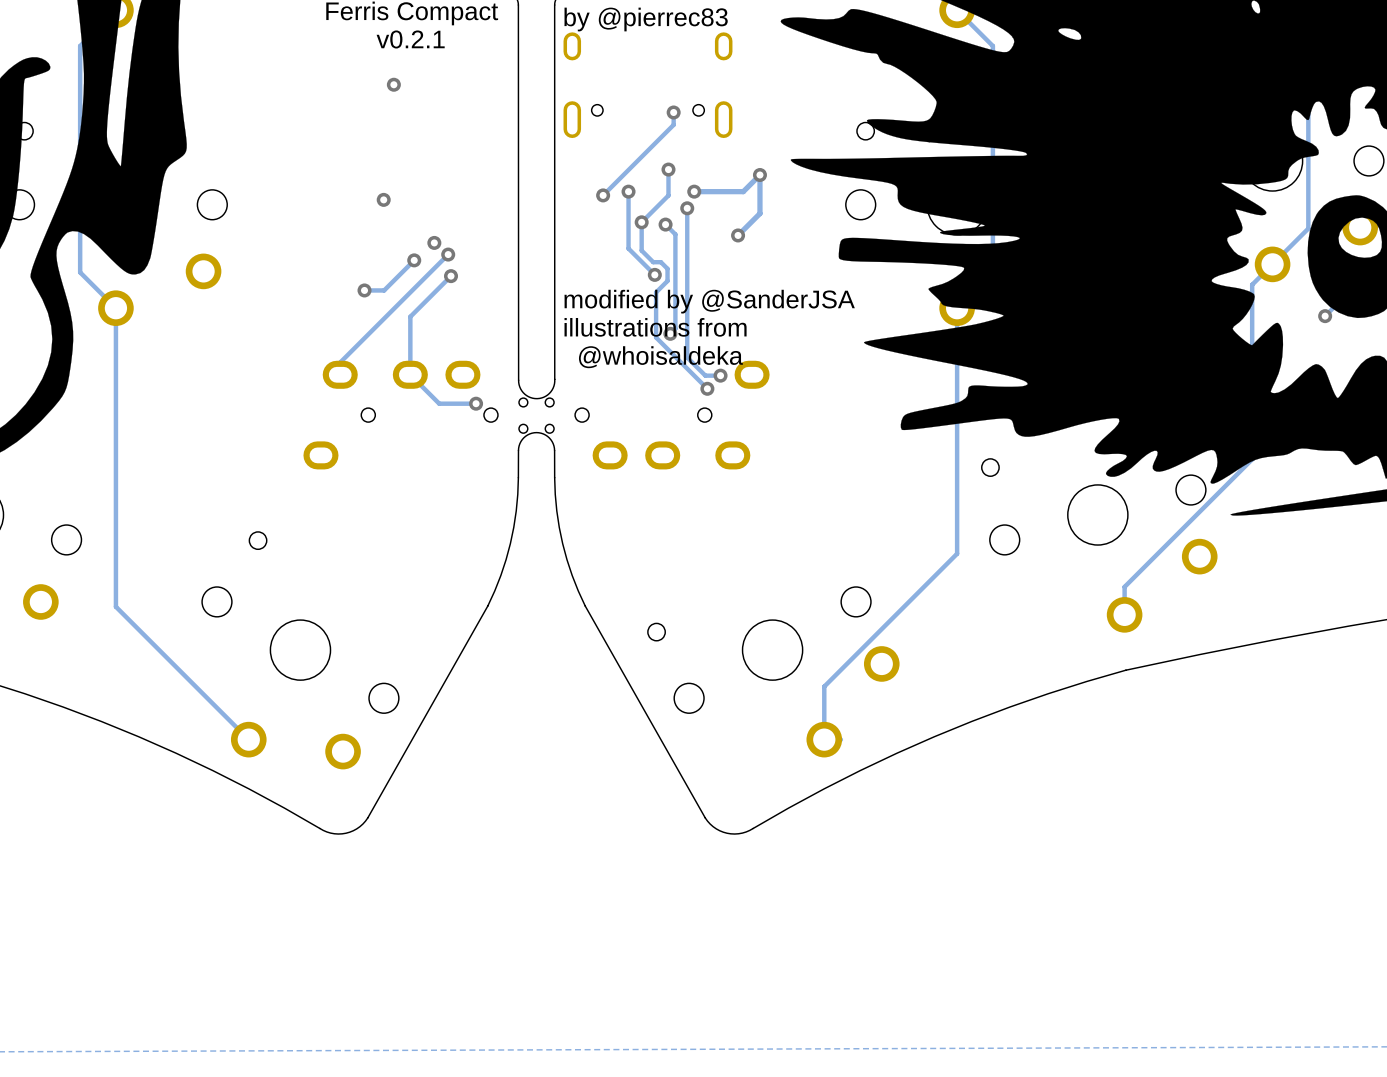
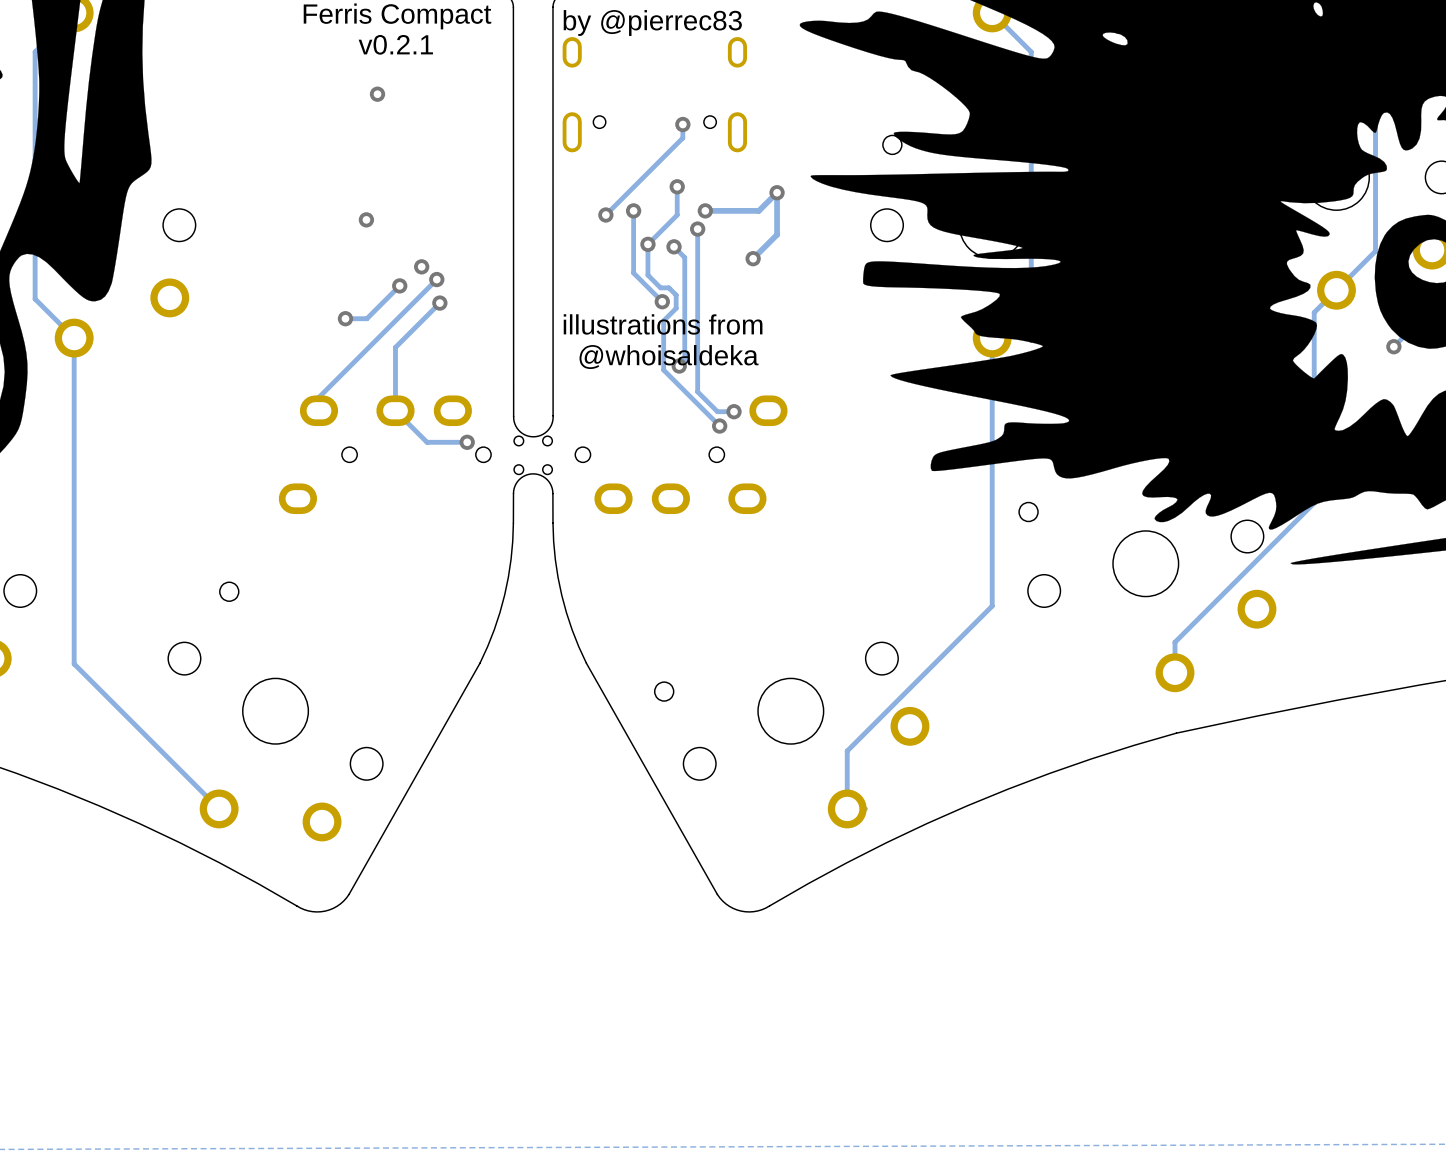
text: modified by @SanderJSA (709, 301) -> illustrations from (663, 324)
text: illustrations from (655, 327) -> @whoisaldeka (669, 357)
text: @whoisaldeka (660, 357) -> none

